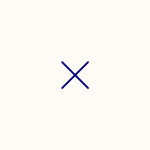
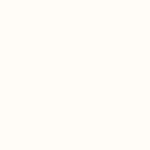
no-connect mark: (75, 75) -> none

